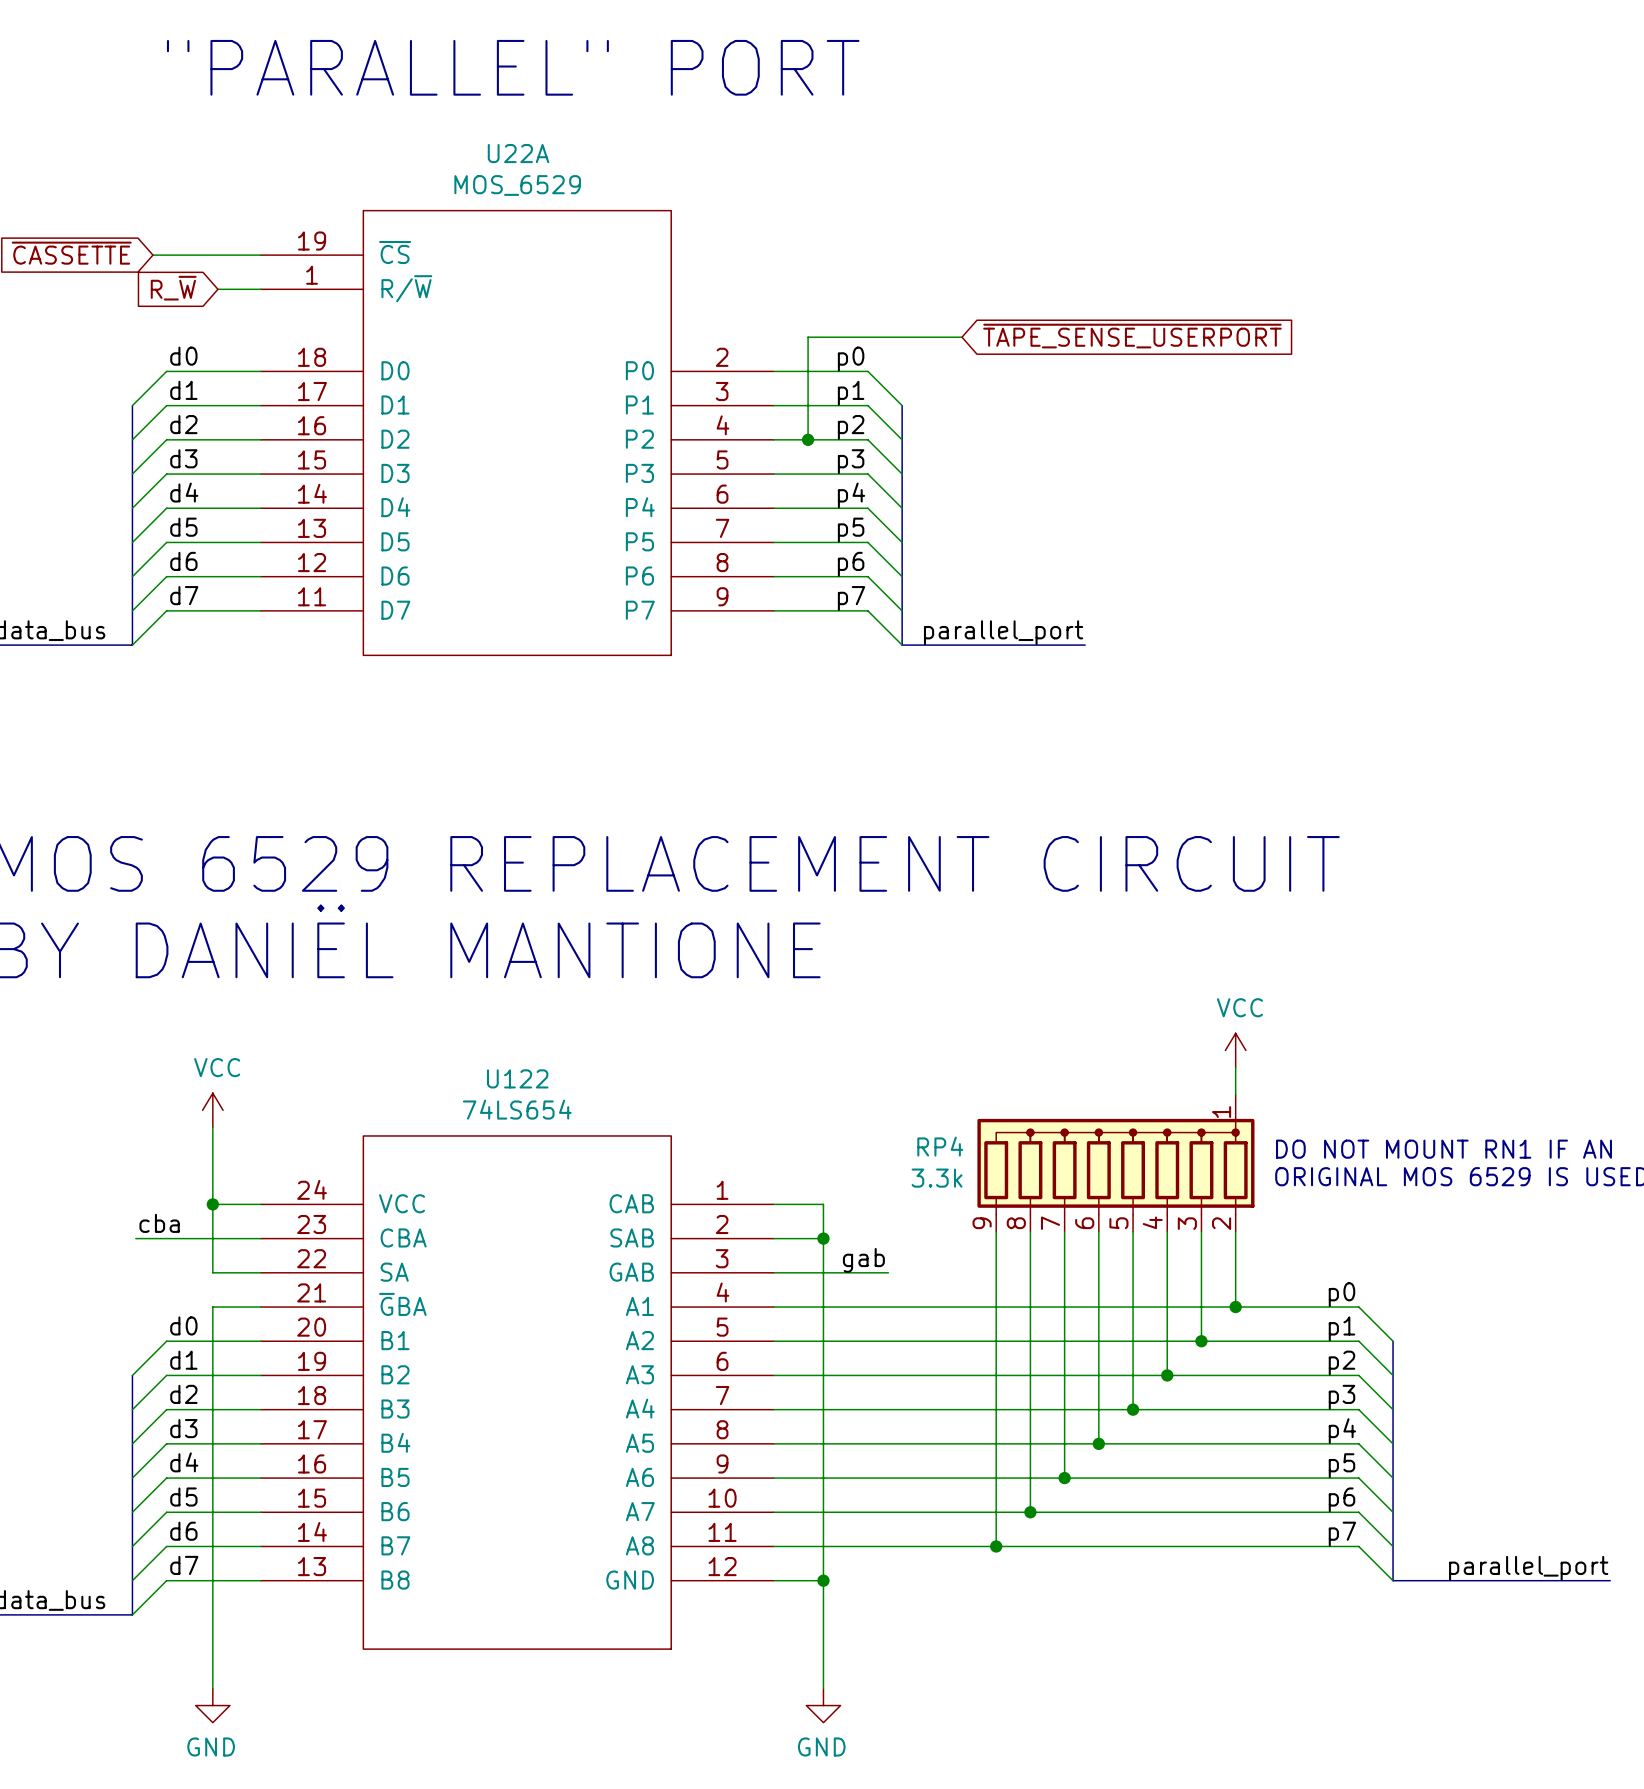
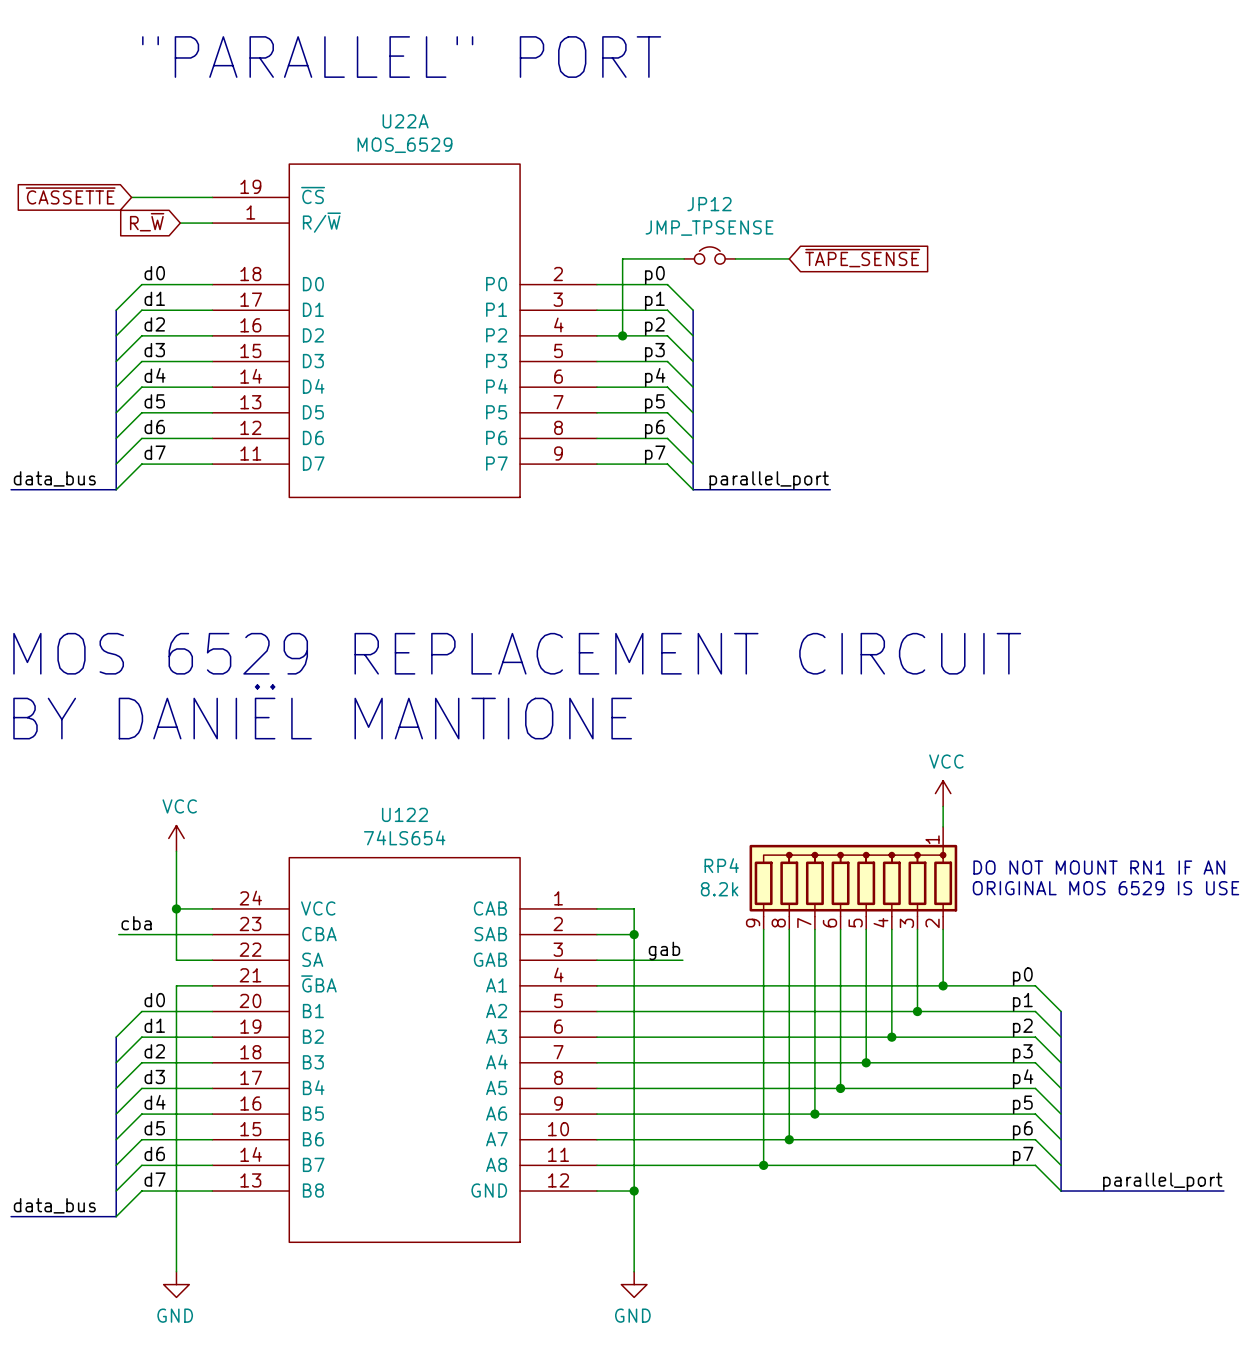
JP12: none -> JMP_TPSENSE (709, 255)
global label: ~{TAPE_SENSE_USERPORT} (1132, 336) -> ~{TAPE_SENSE} (862, 258)
wire: (890, 337) (958, 337) -> (738, 258) (789, 258)
RP4 value: 3.3k (937, 1178) -> 8.2k (719, 889)

